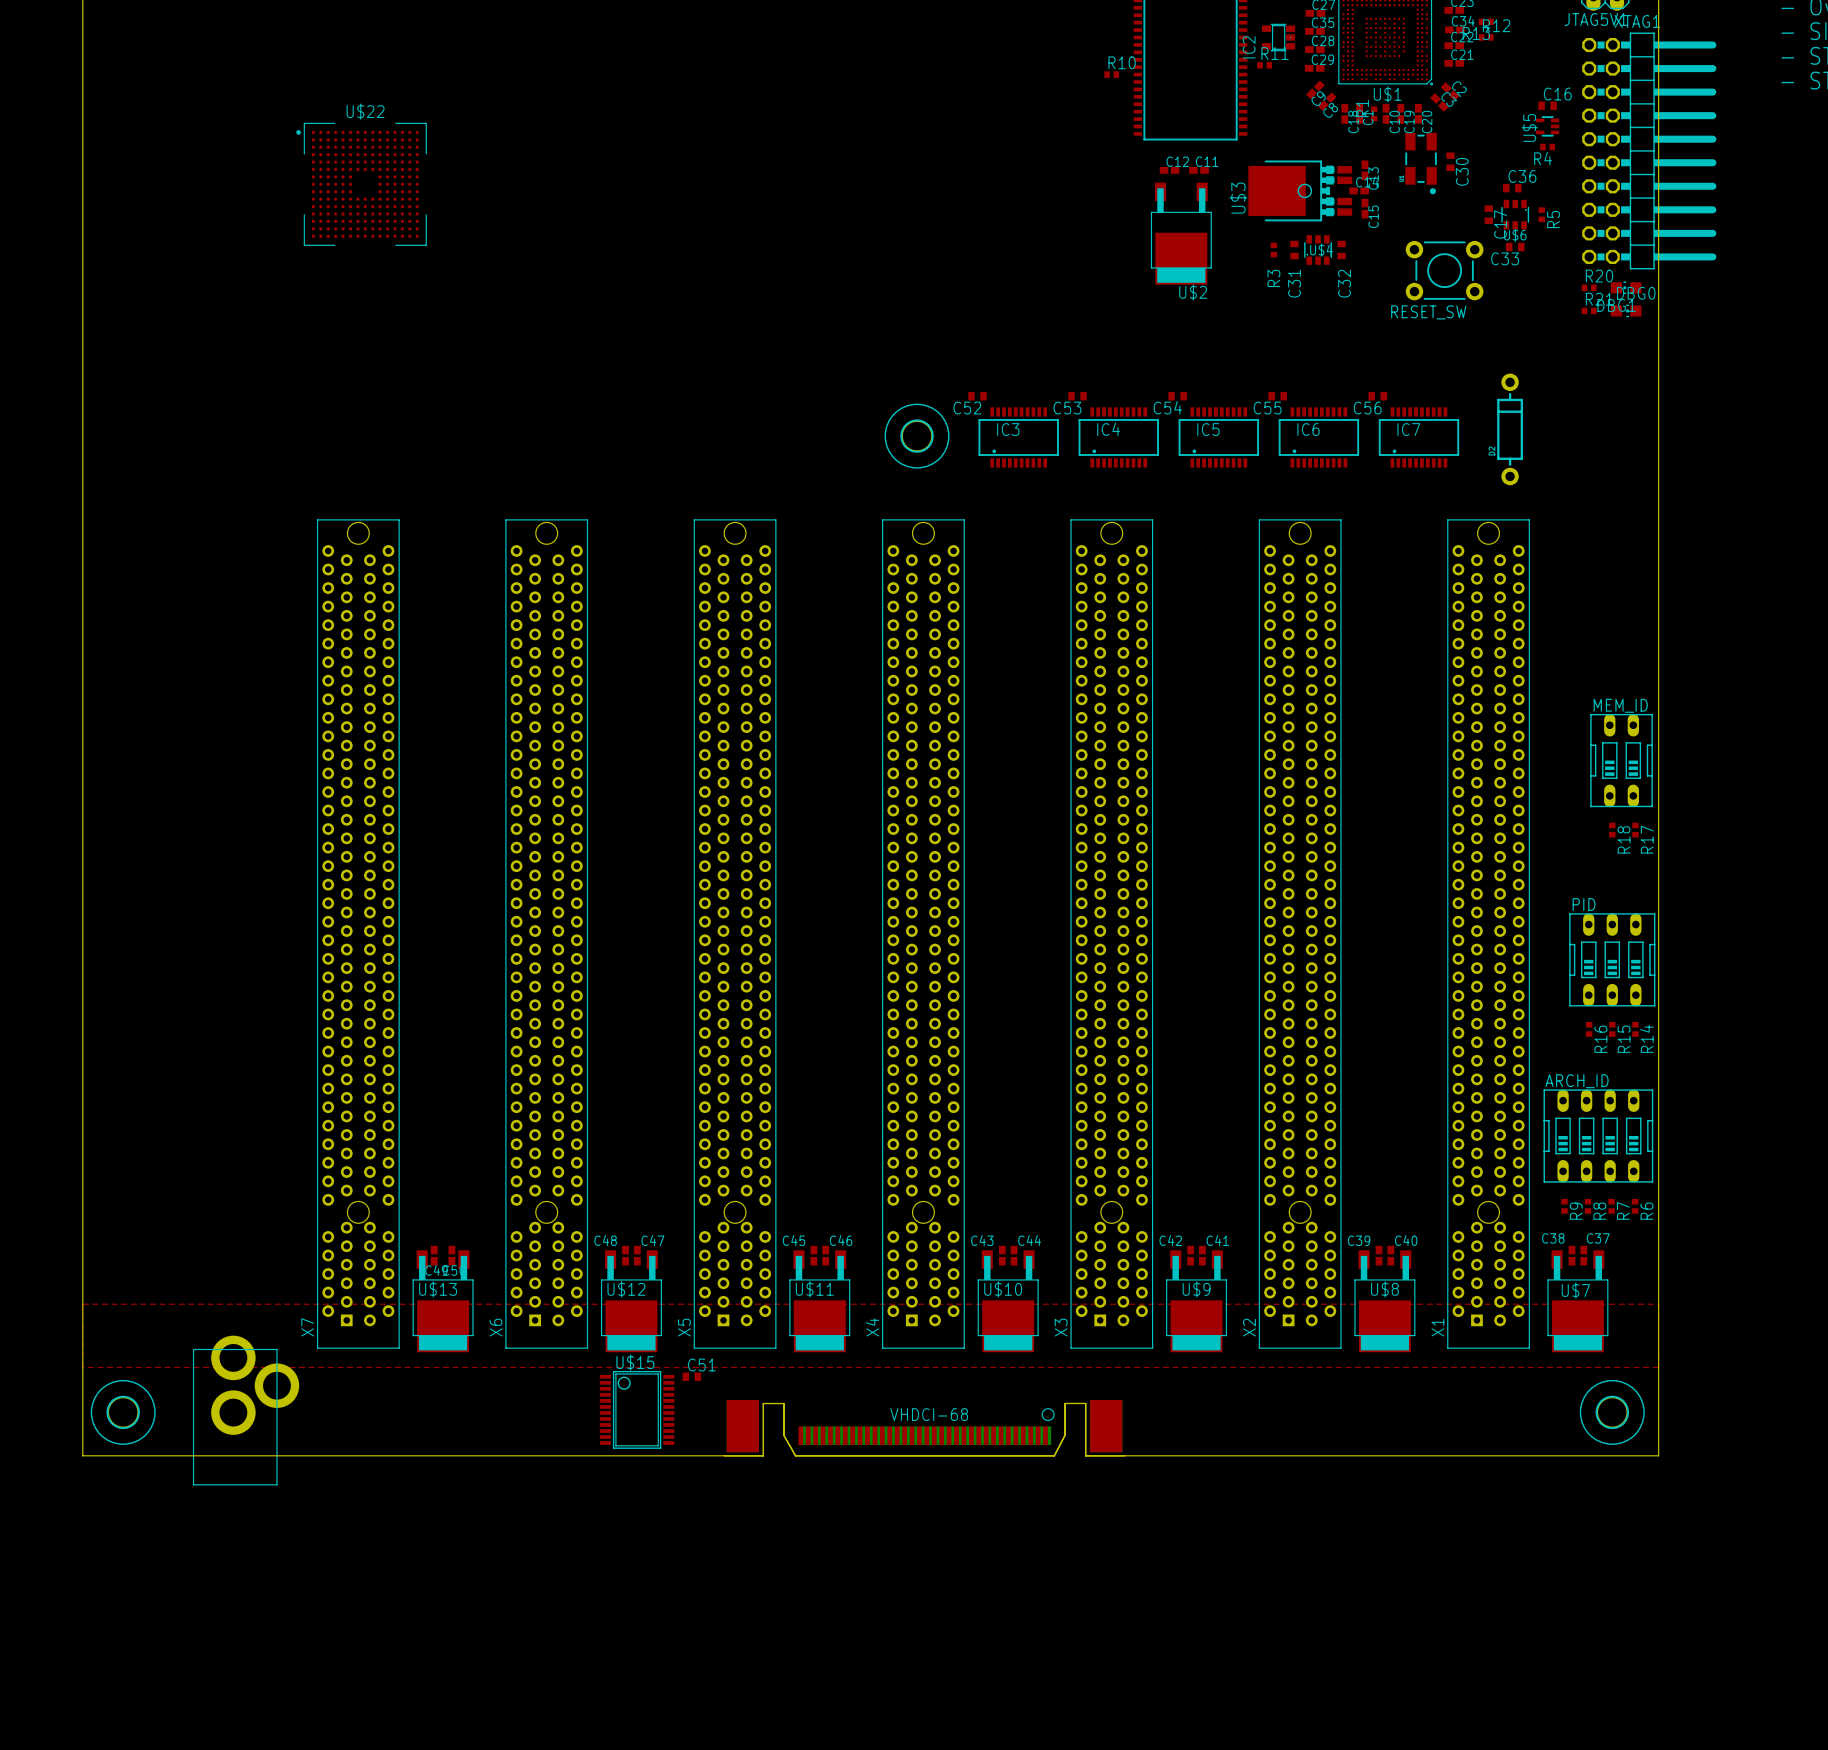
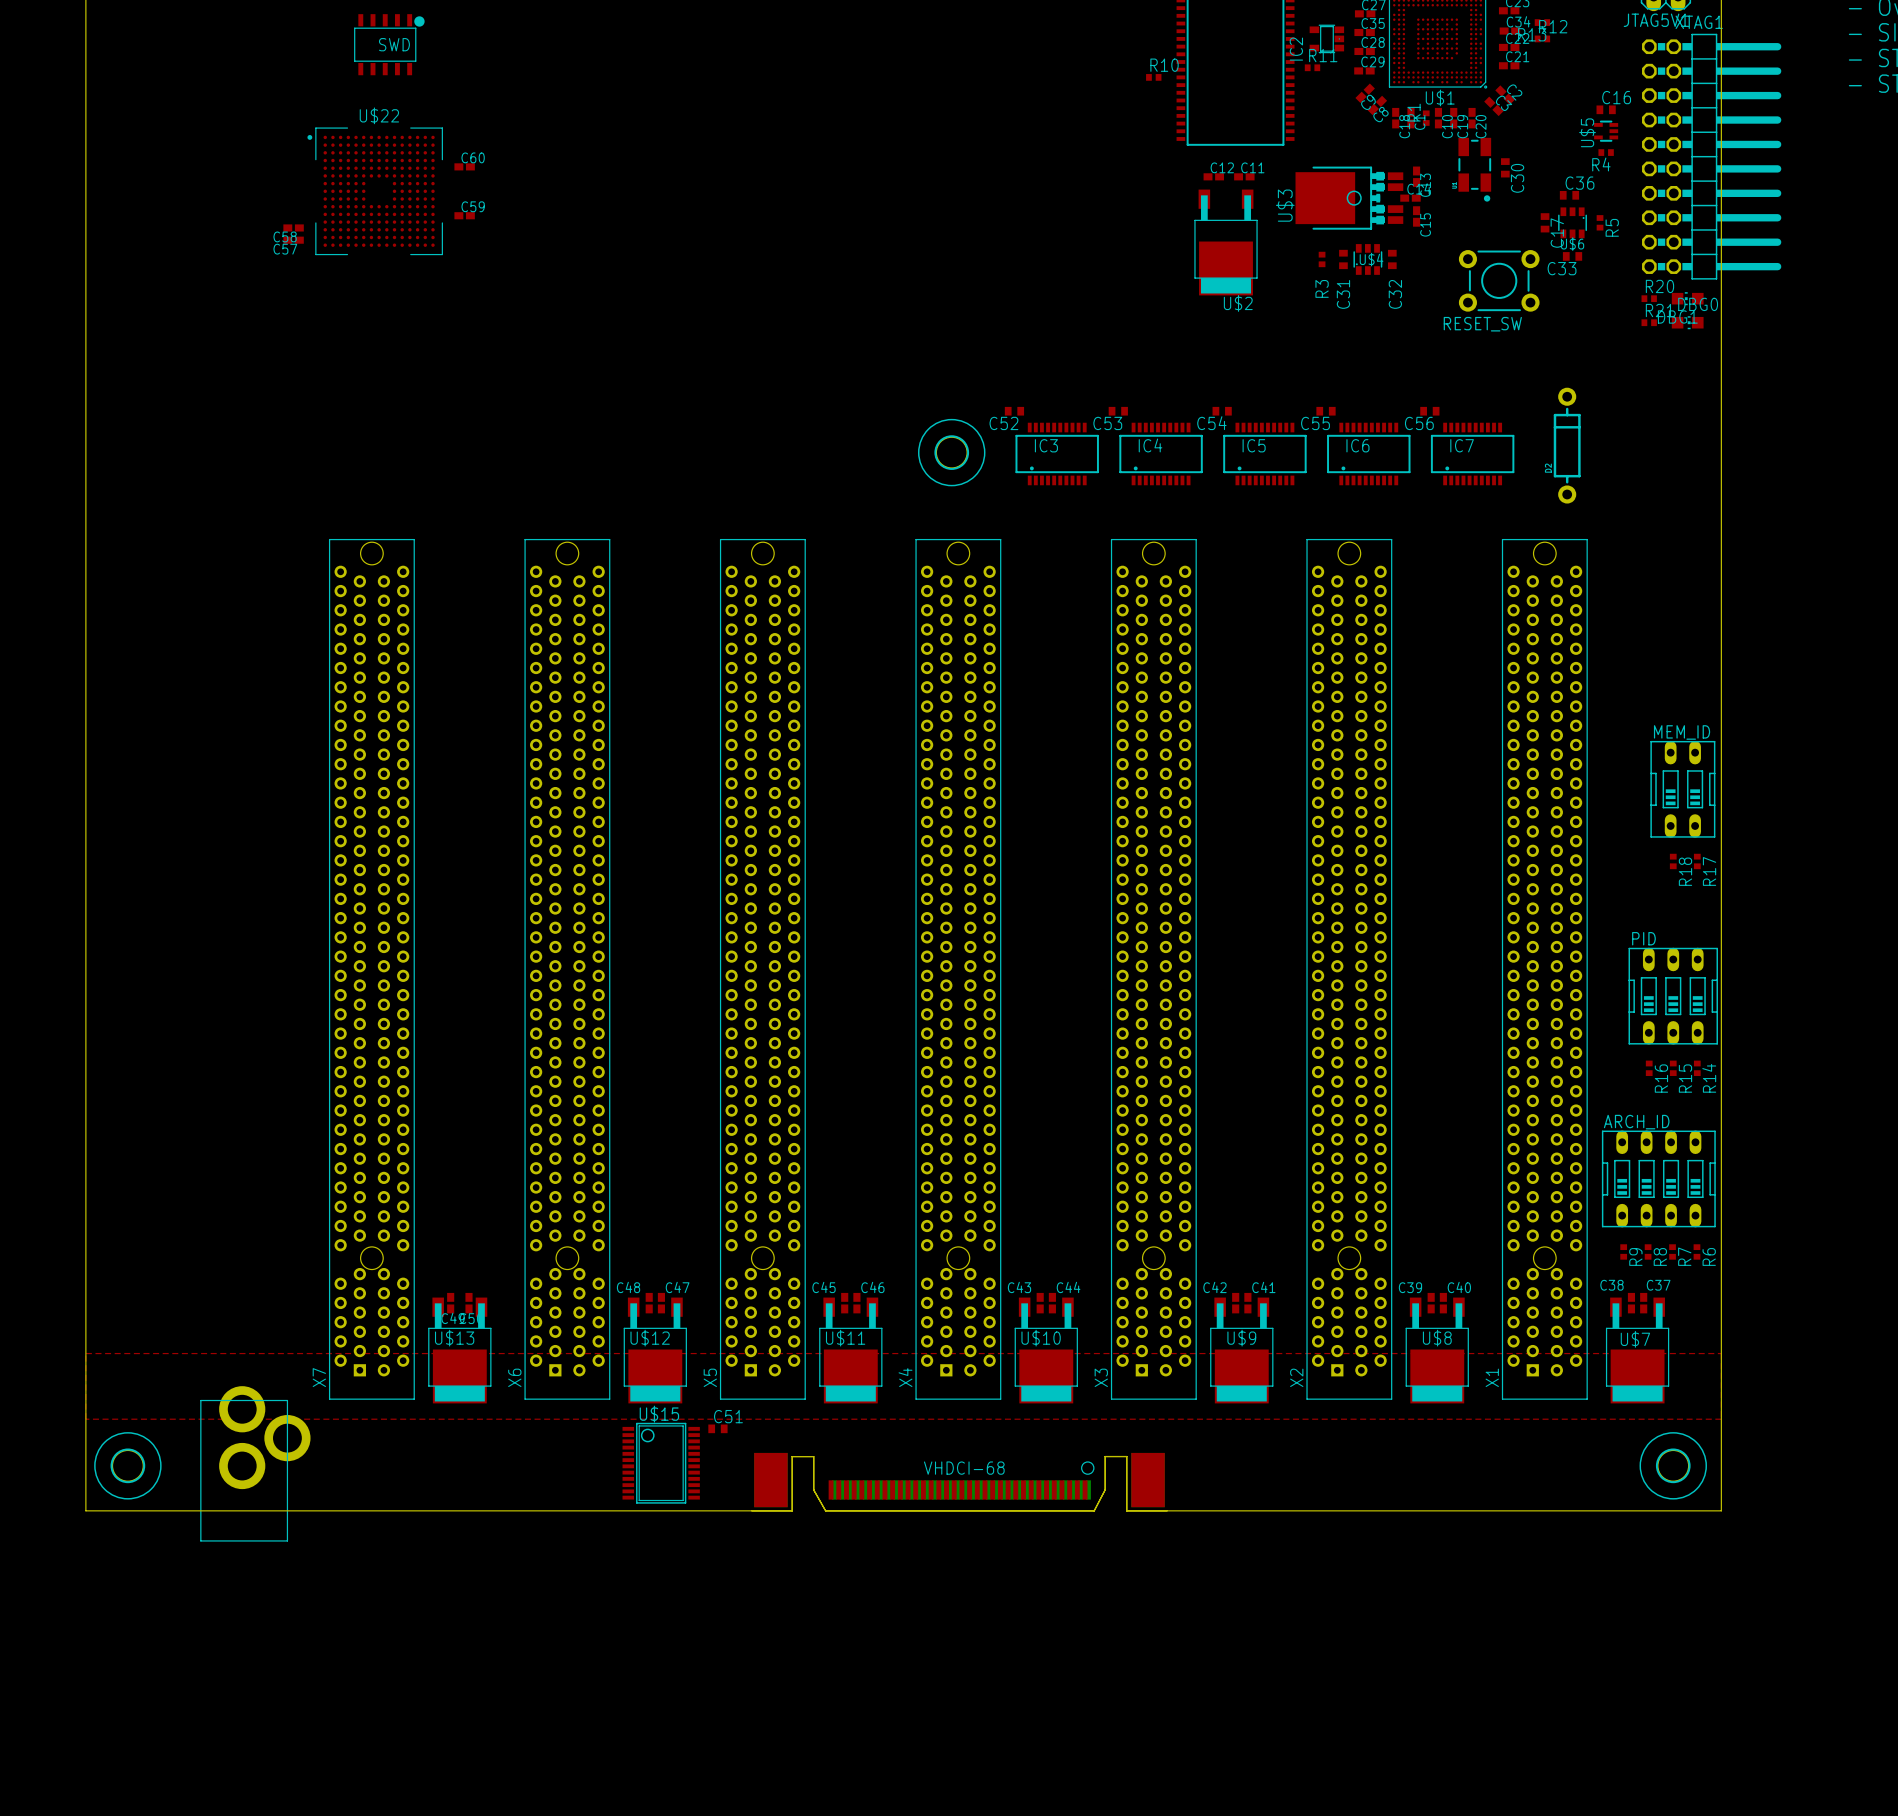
SWD: none -> (389, 44)
C60: none -> (464, 166)
C59: none -> (464, 215)
C58: none -> (293, 227)
C57: none -> (293, 240)

